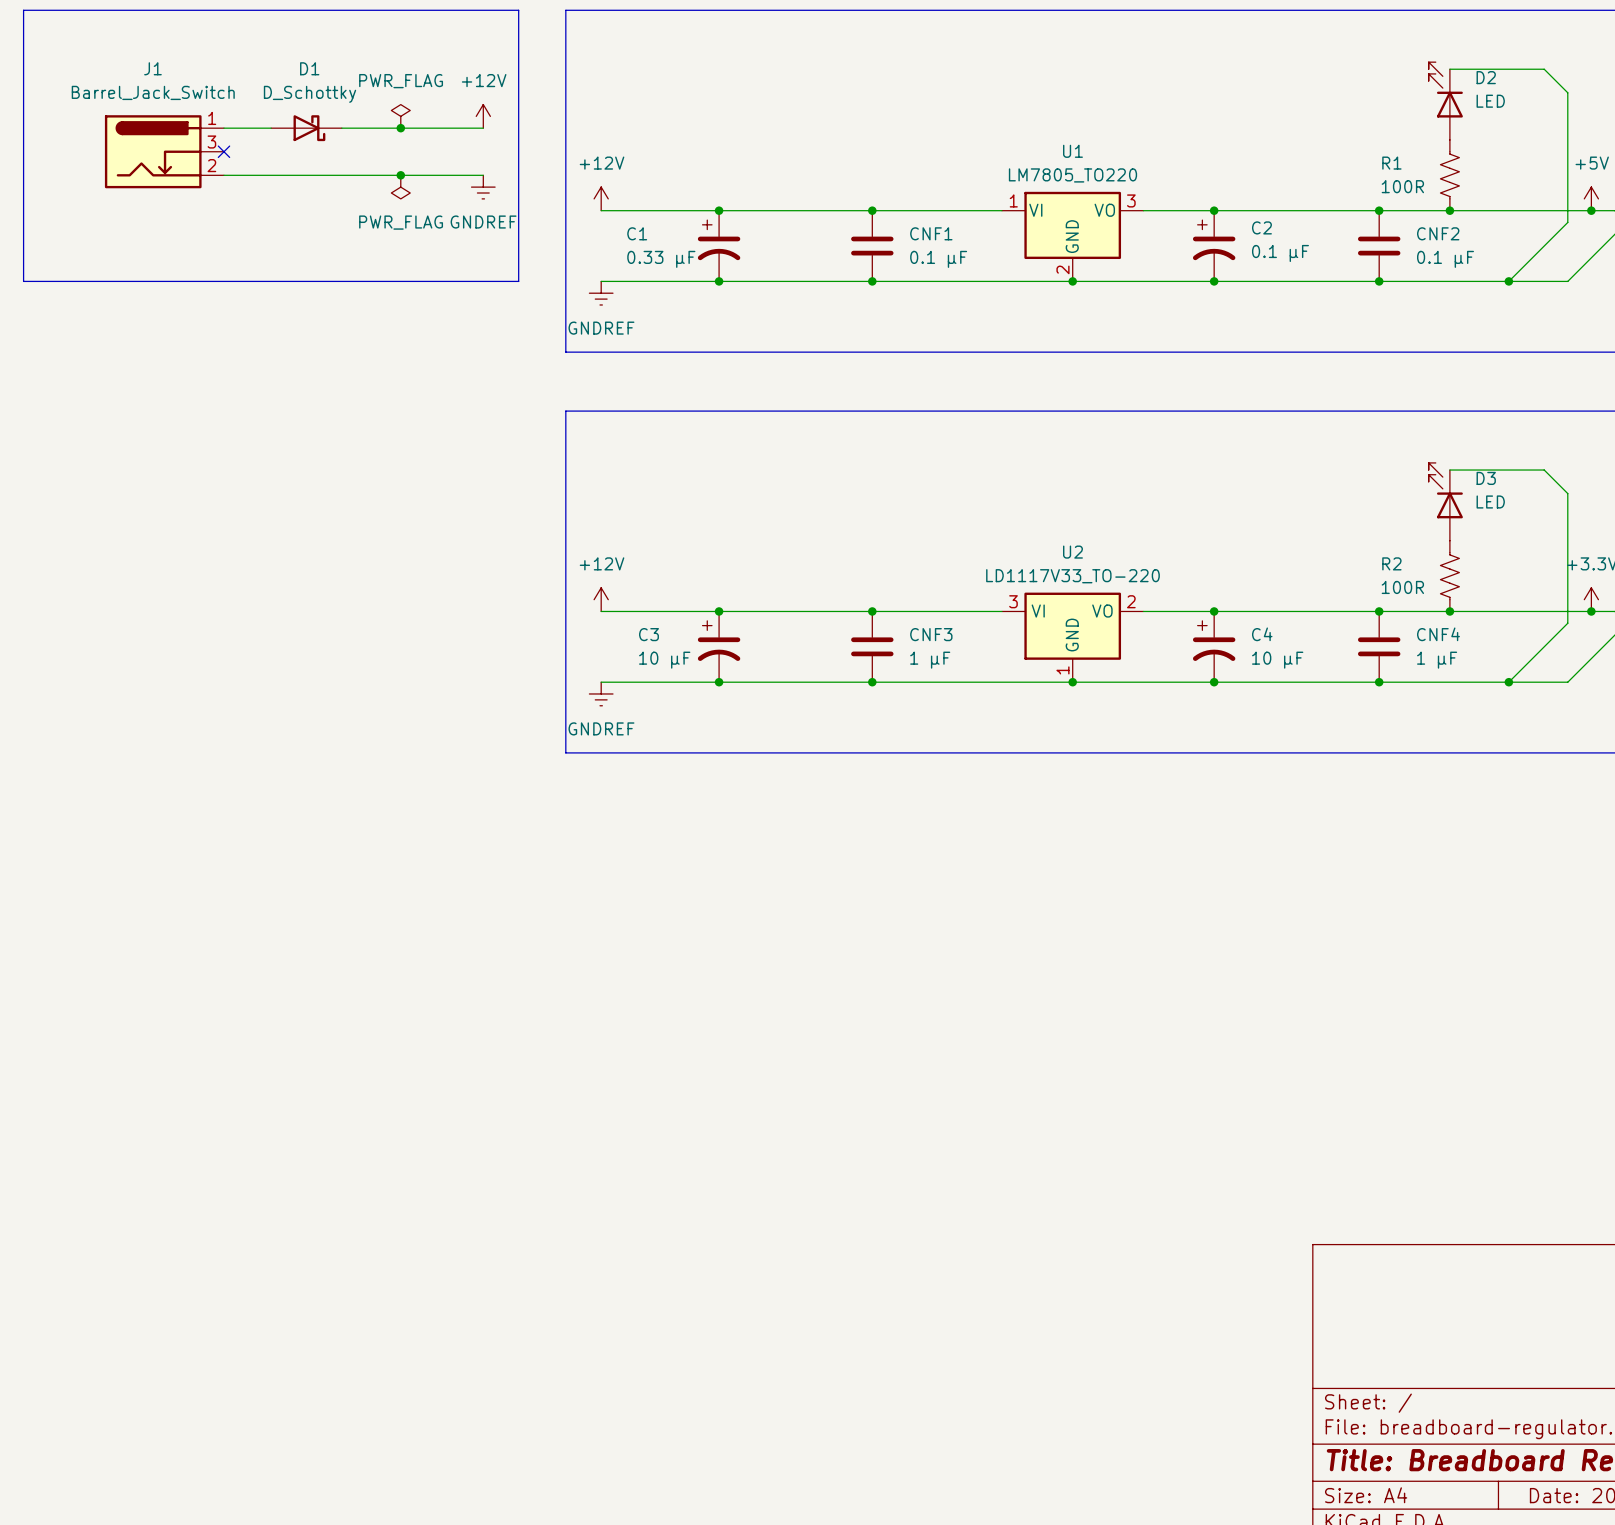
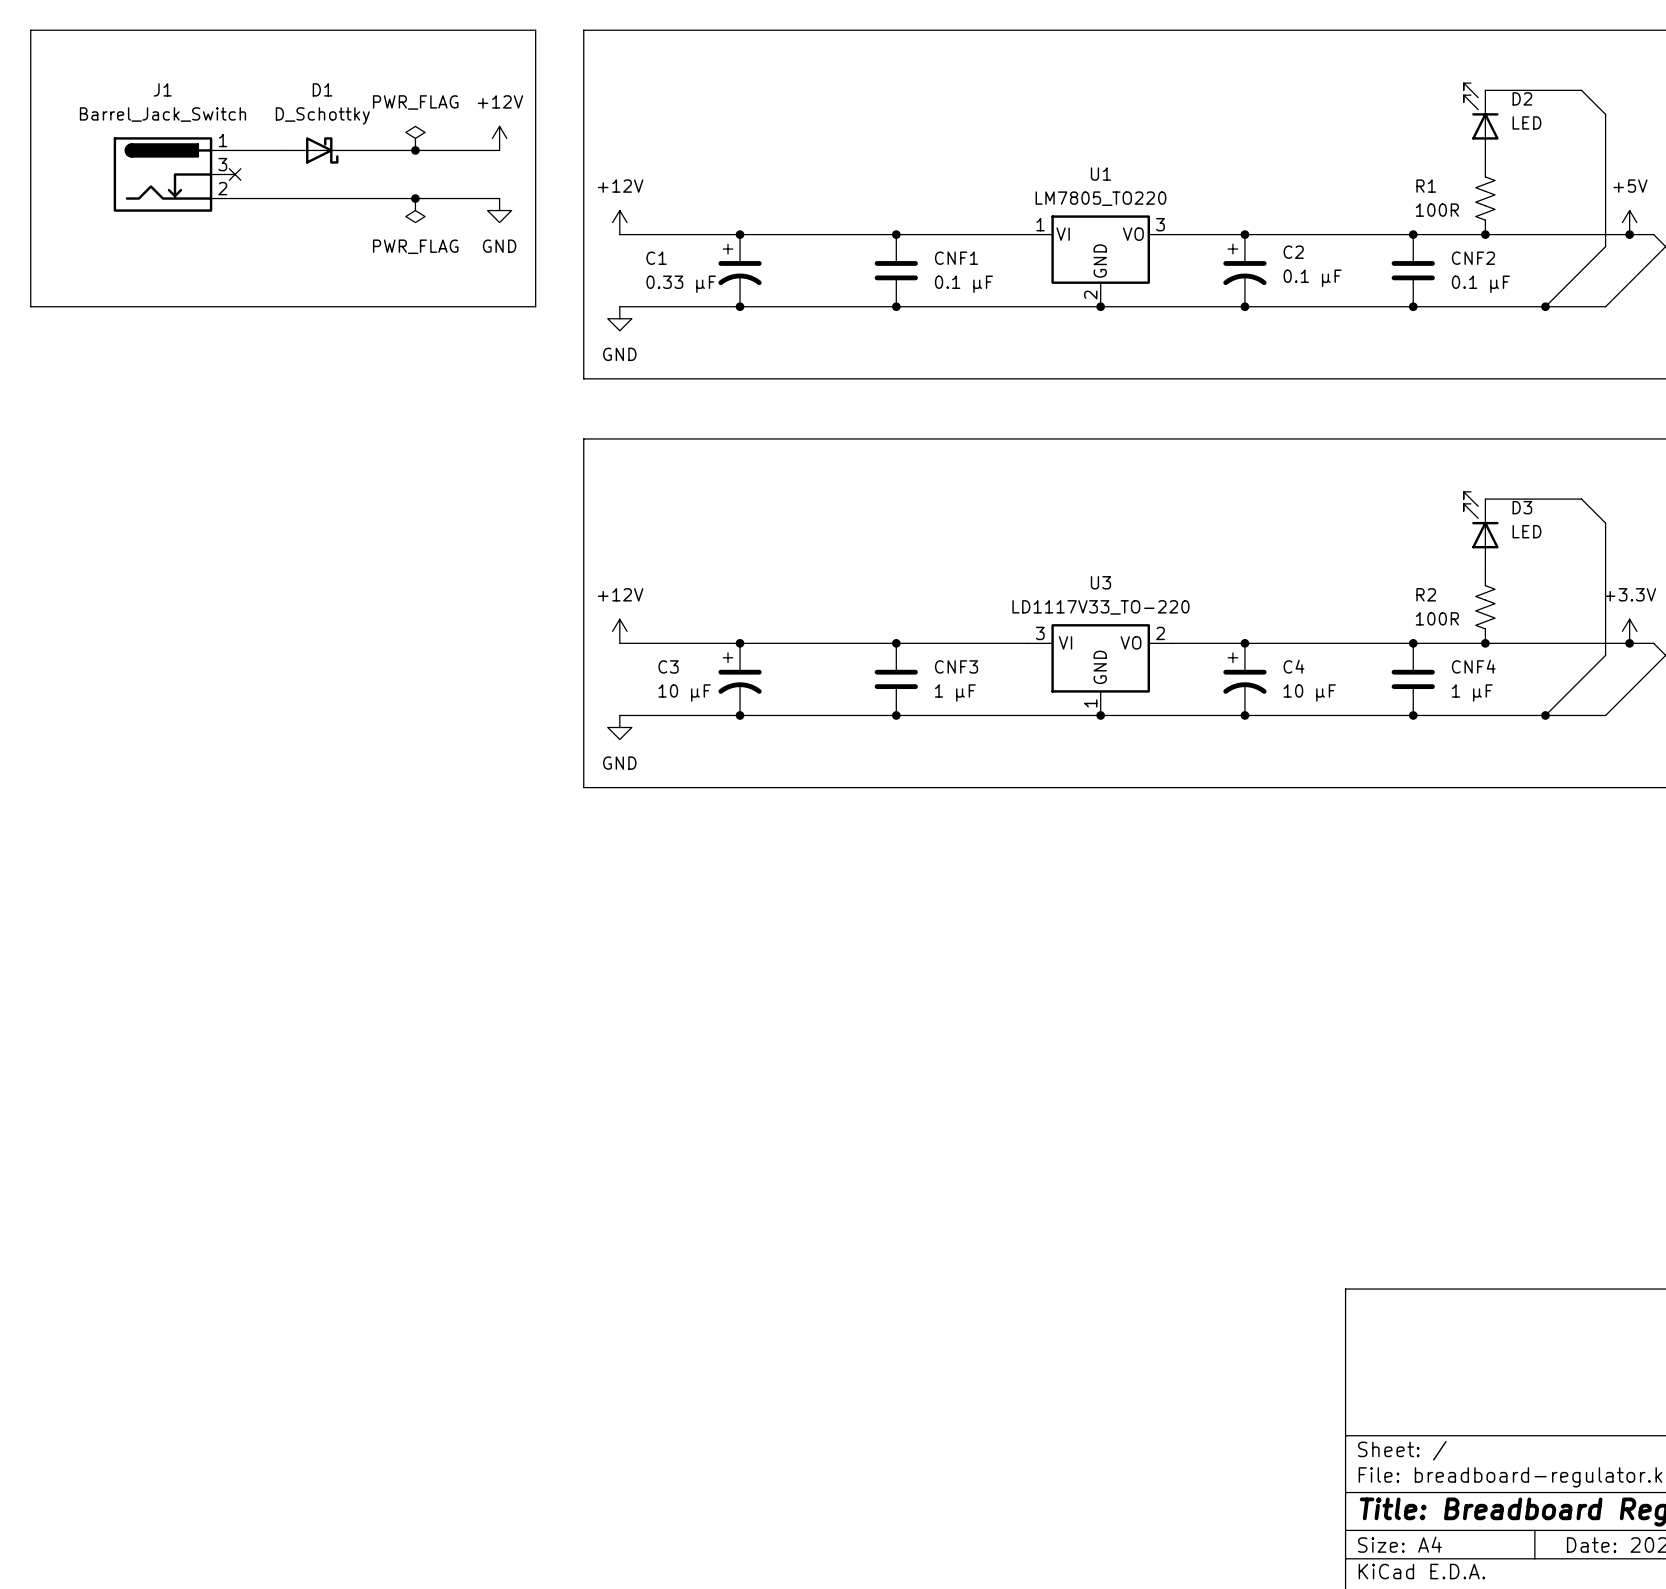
power symbol: GNDREF (483, 187) -> GND (499, 210)
power symbol: GNDREF (601, 293) -> GND (619, 318)
U2 name: U2 (1072, 552) -> U3 (1100, 582)
power symbol: GNDREF (601, 693) -> GND (619, 727)

